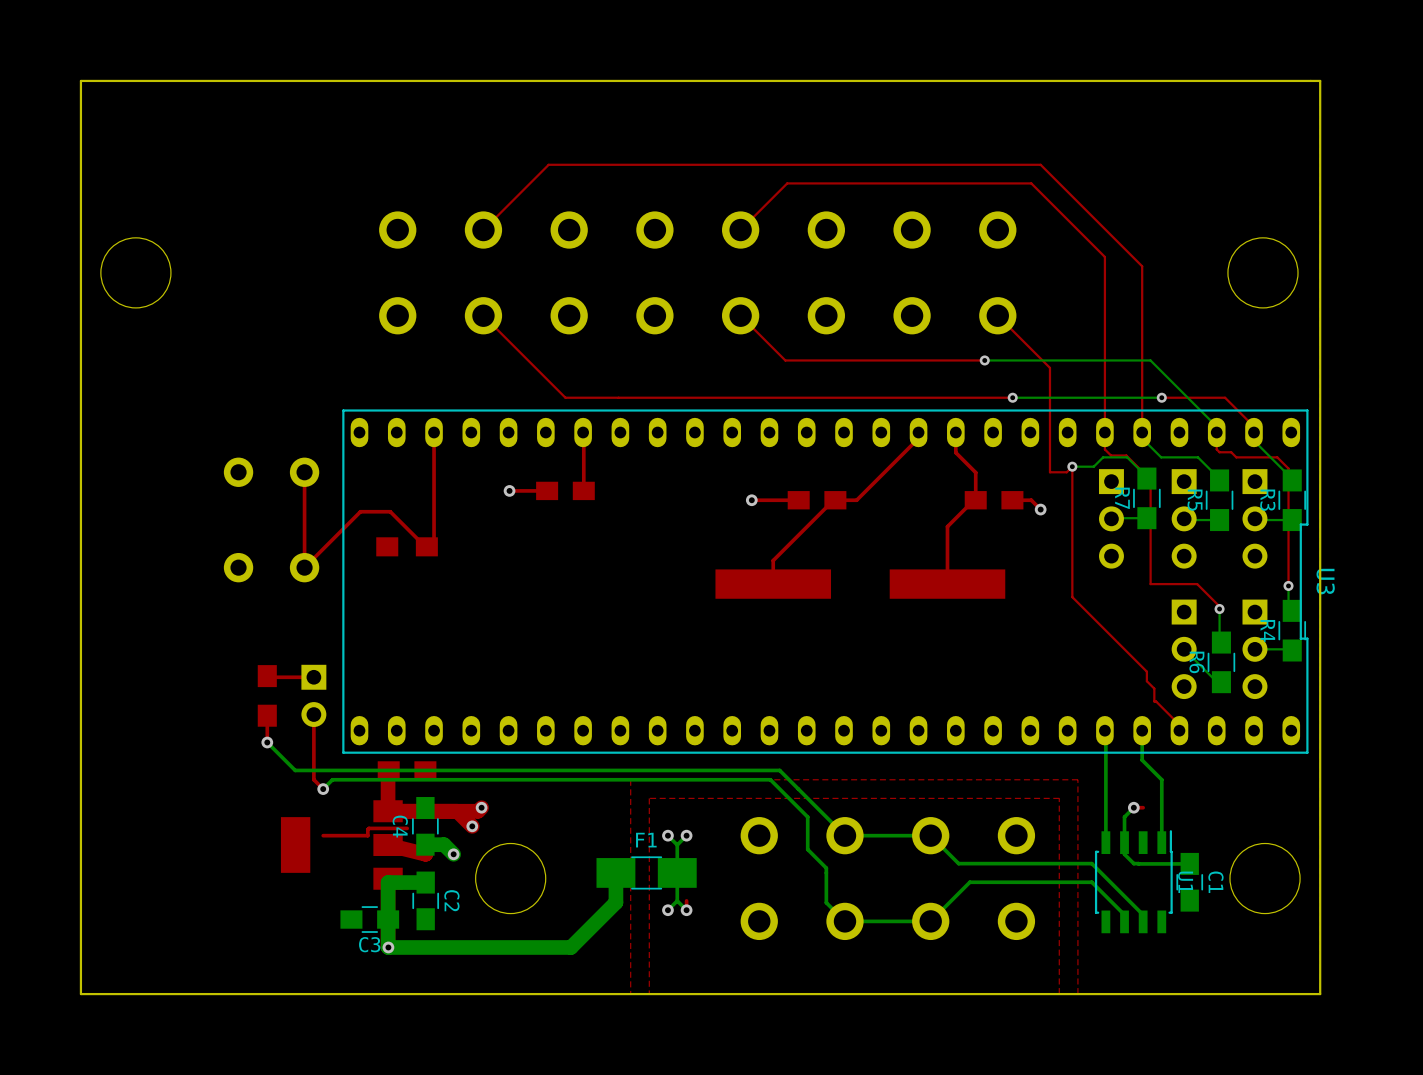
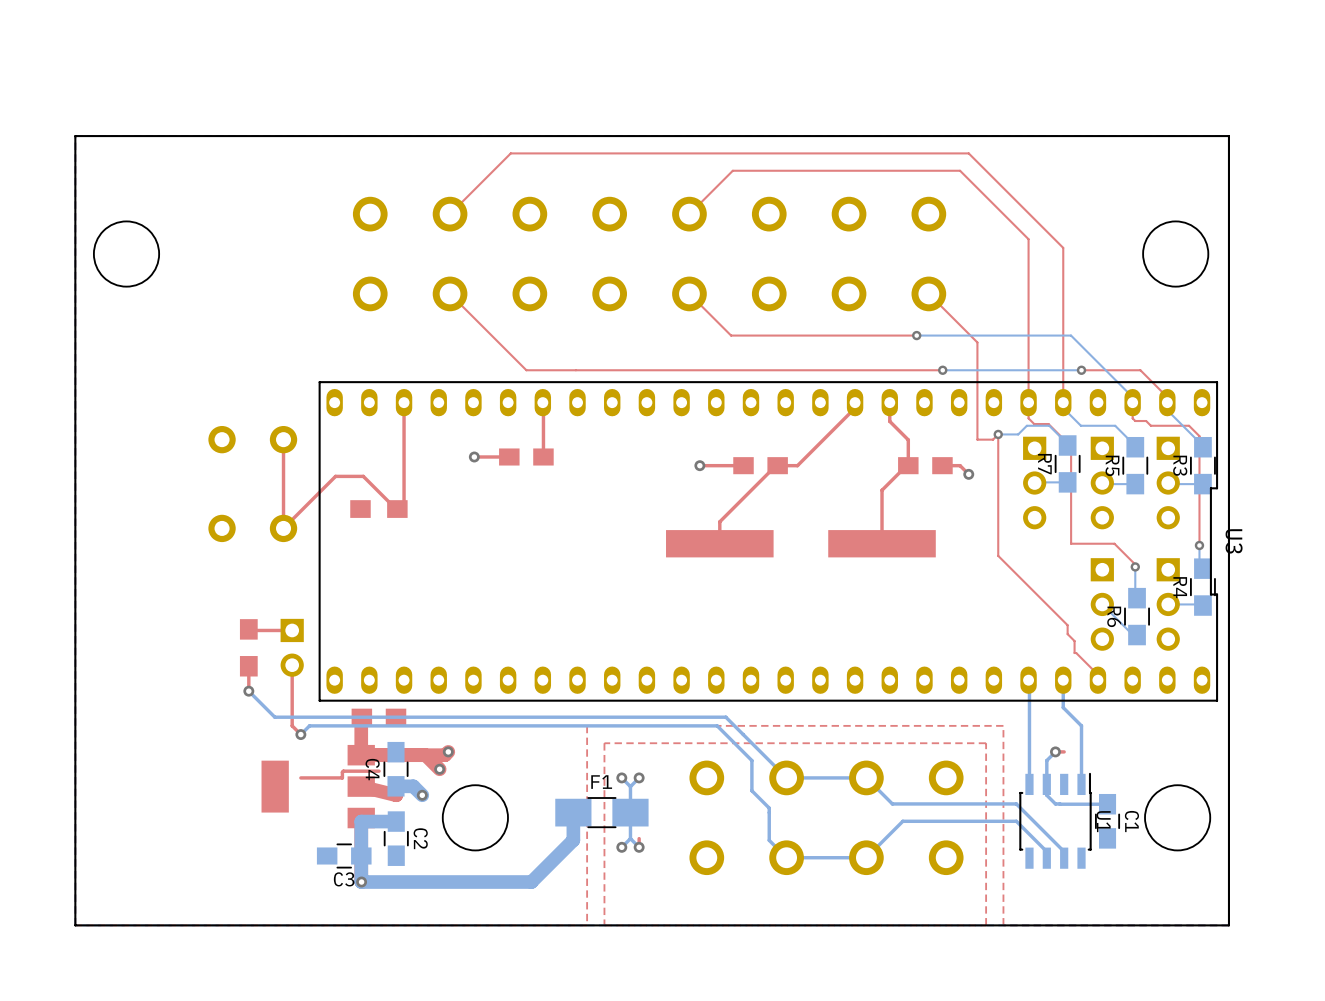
board edge: (1320, 146) (1320, 80) (80, 80) (80, 146) -> (1228, 136) (75, 136)

